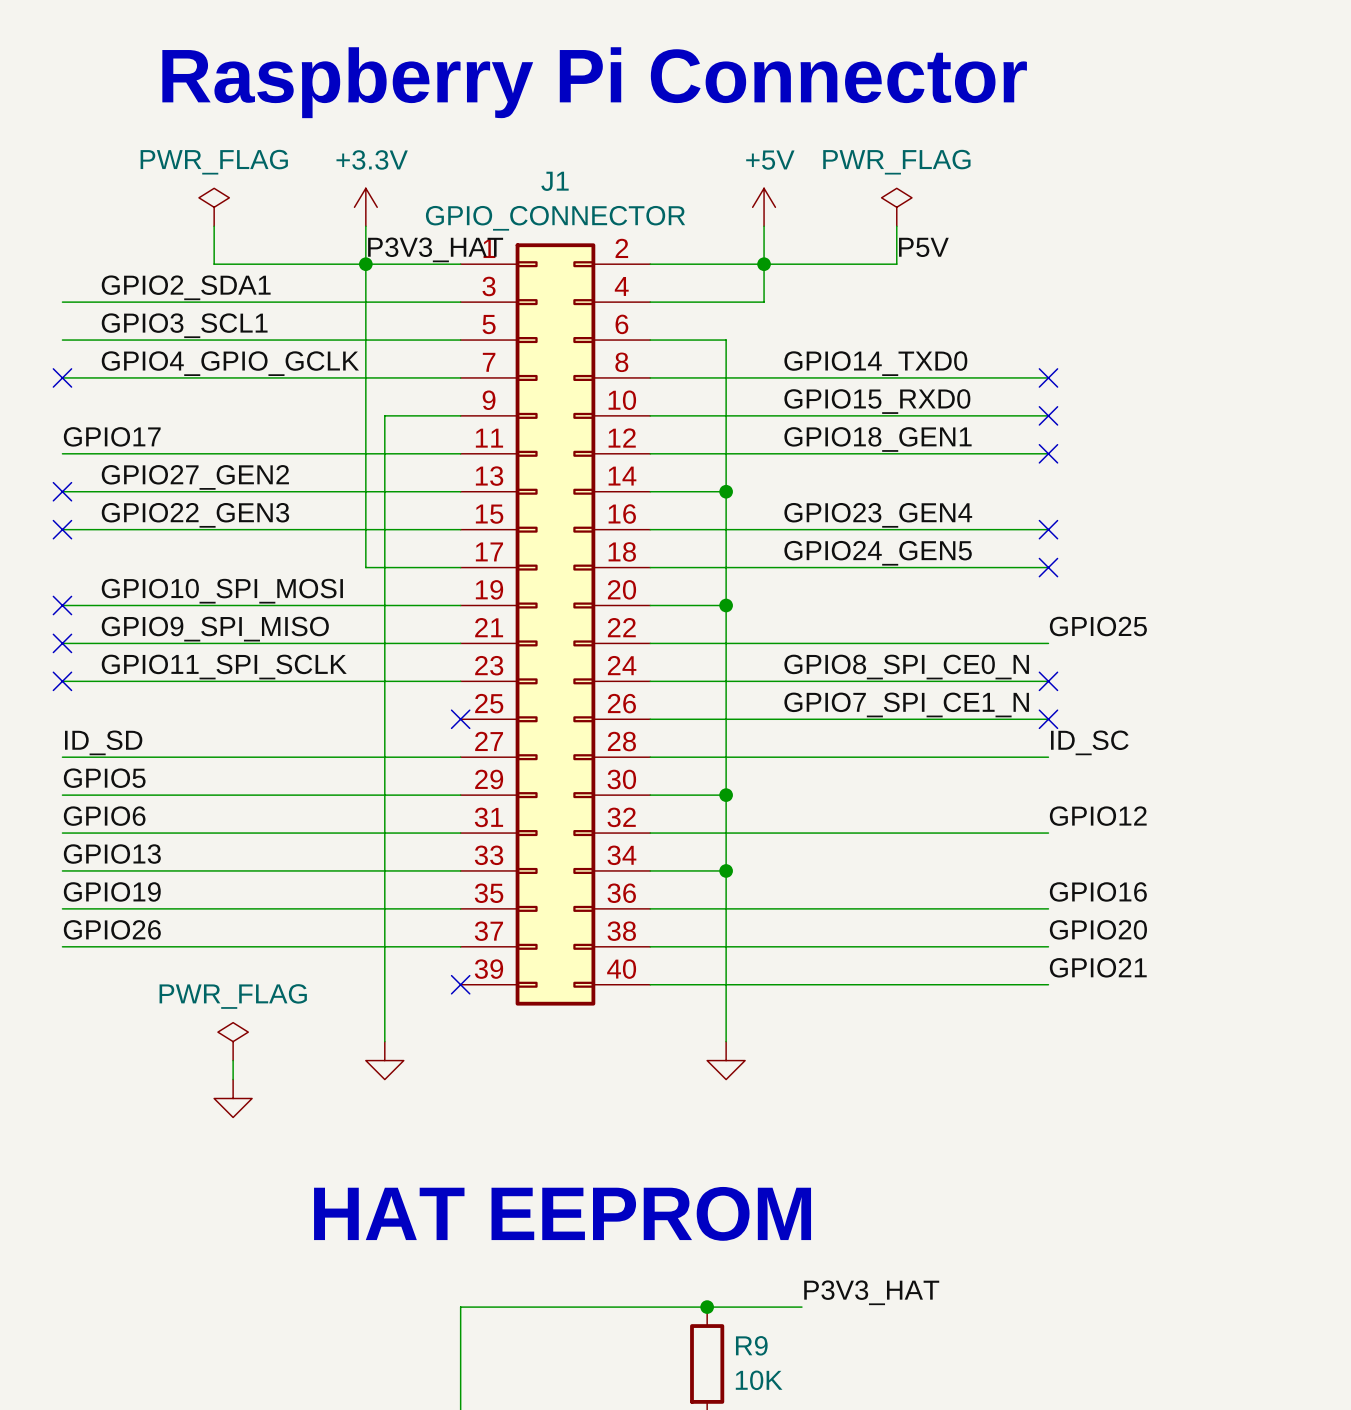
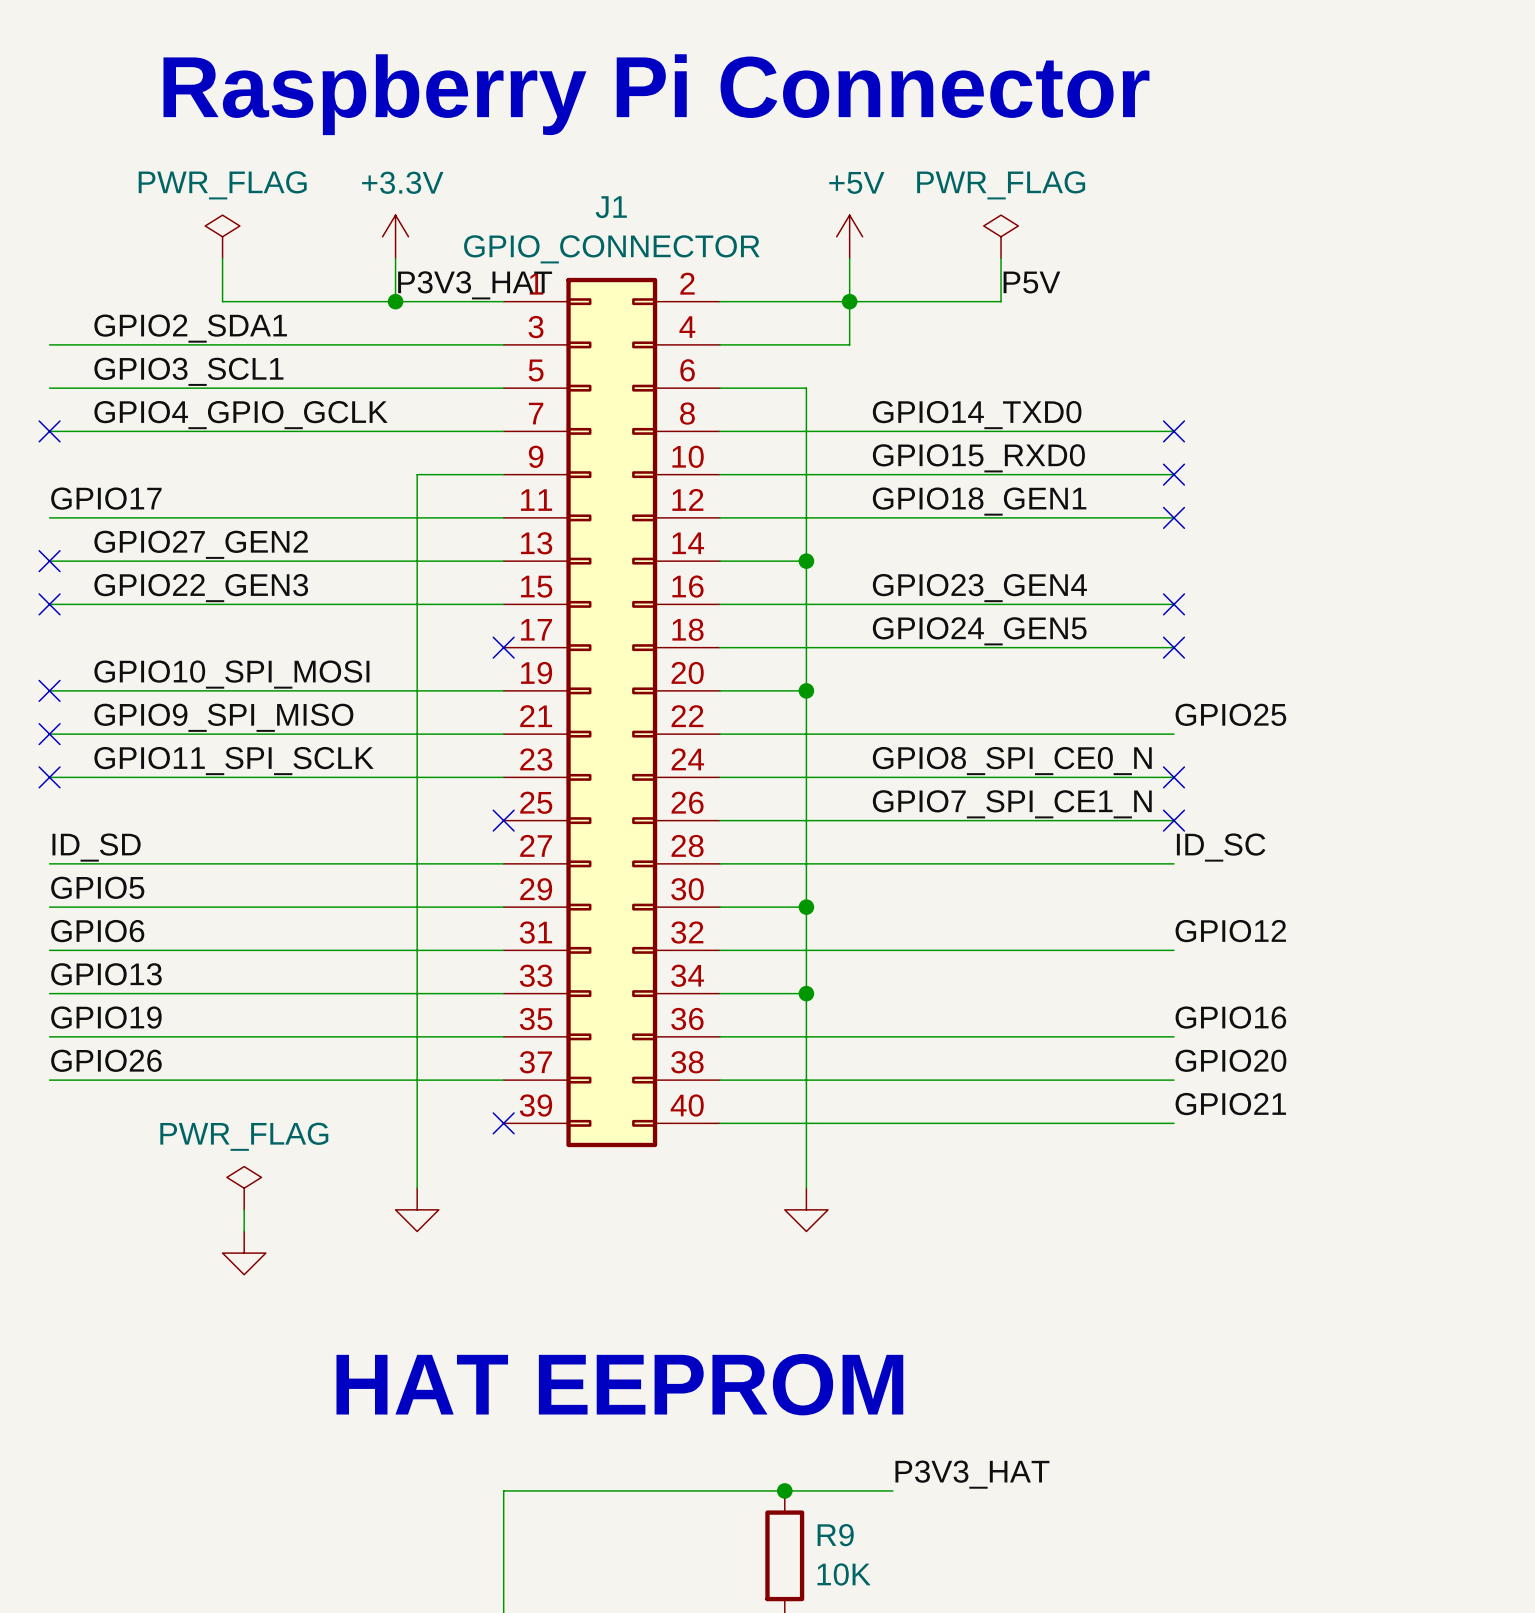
wire: (365, 264) (365, 567) (460, 567) -> none
no-connect mark: none -> (503, 647)

